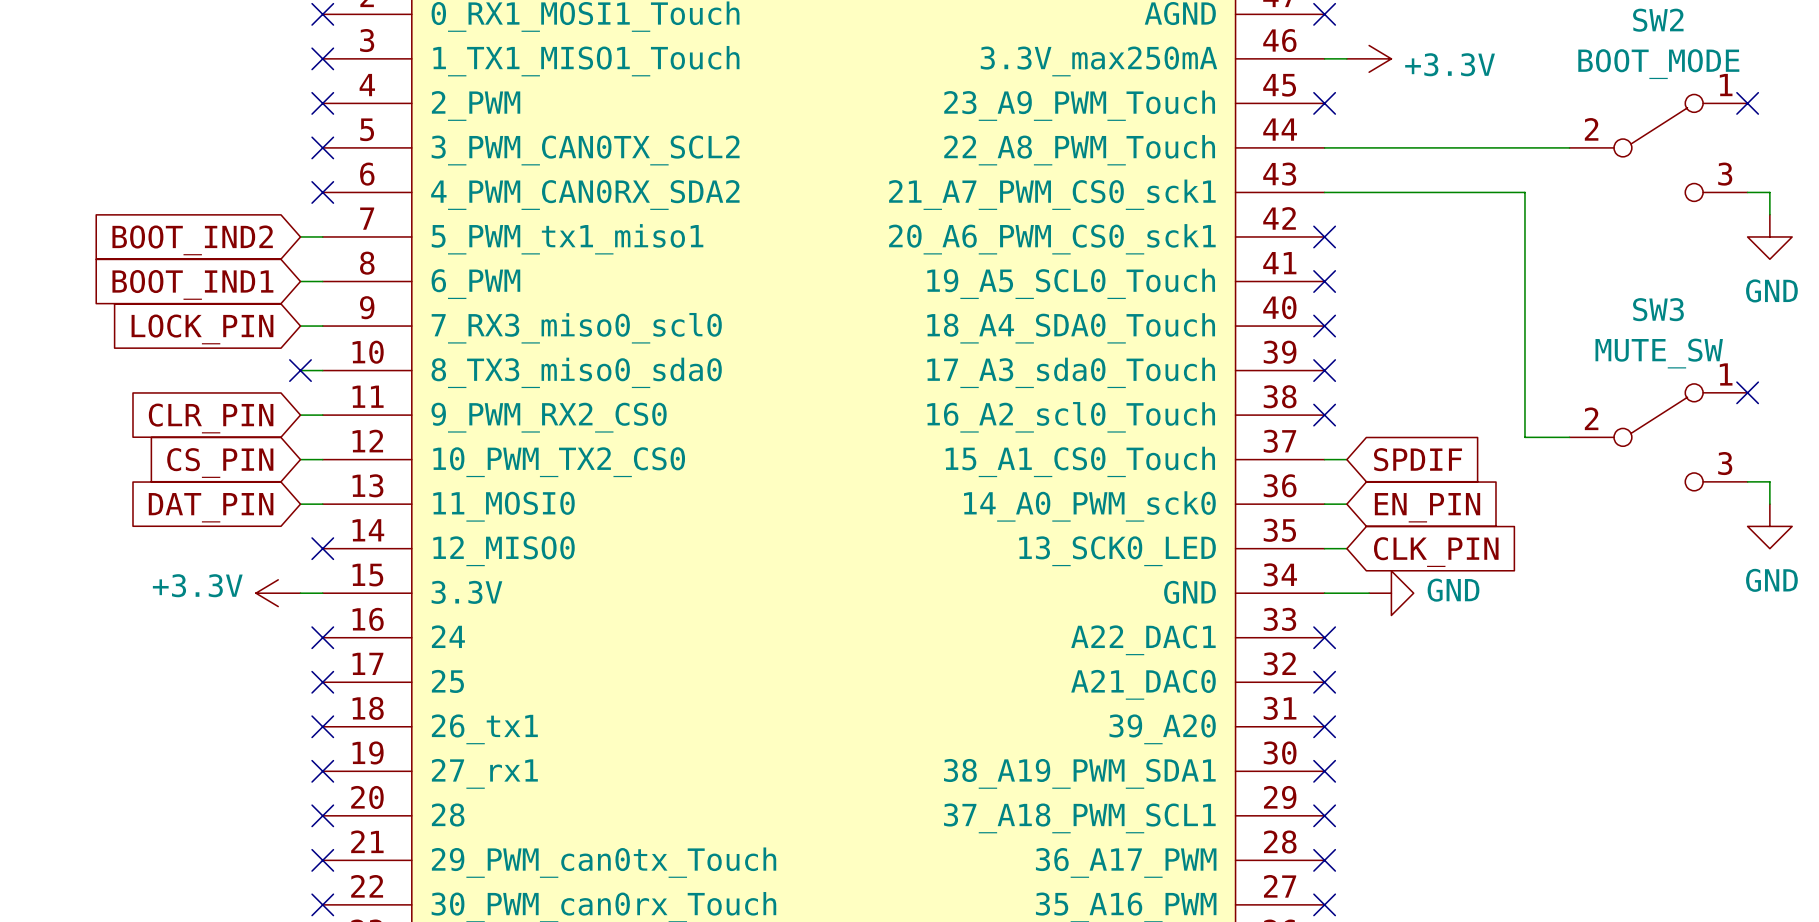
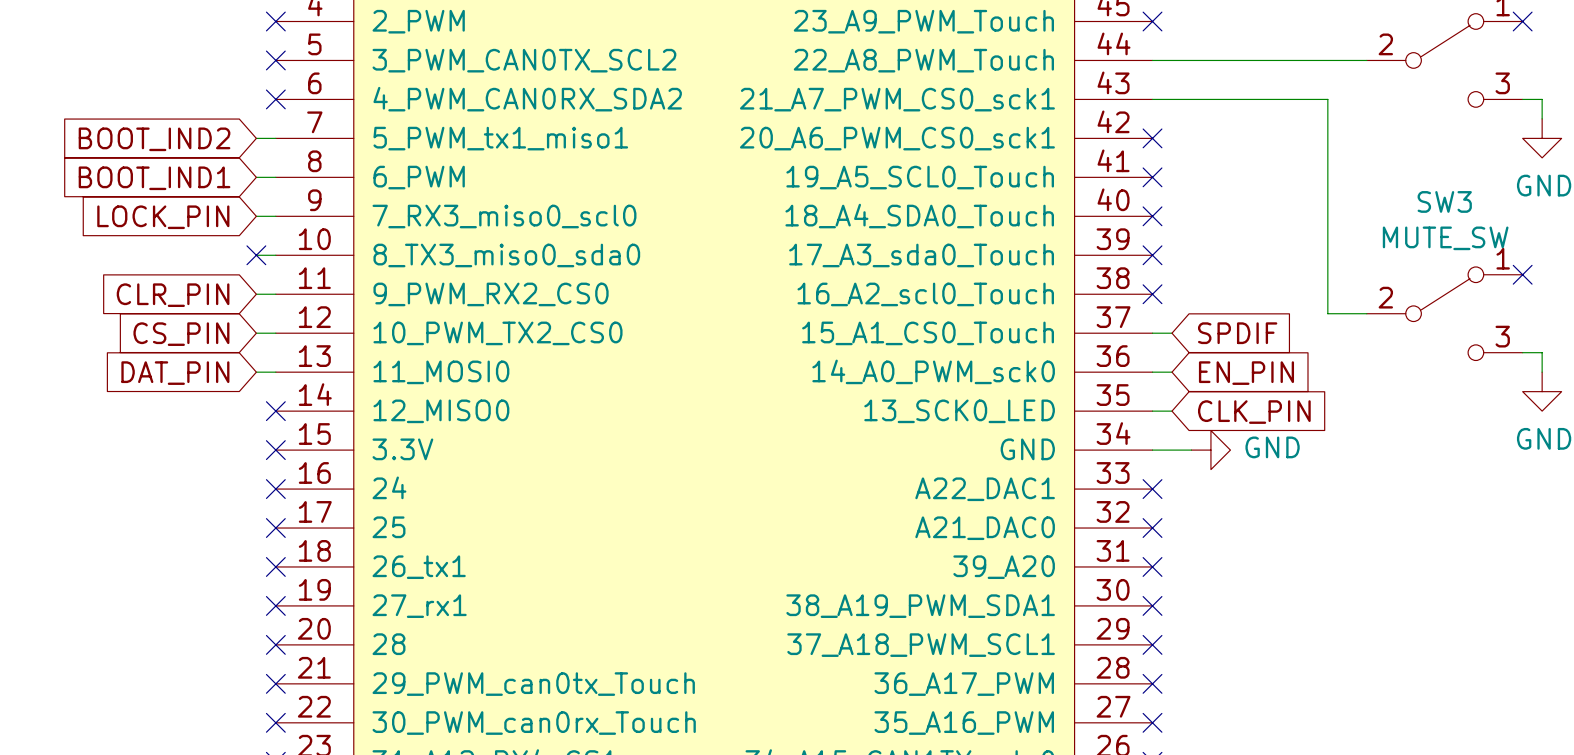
power symbol: +3.3V (278, 593) -> none
wire: (300, 593) (322, 593) -> none
no-connect mark: none -> (275, 450)

